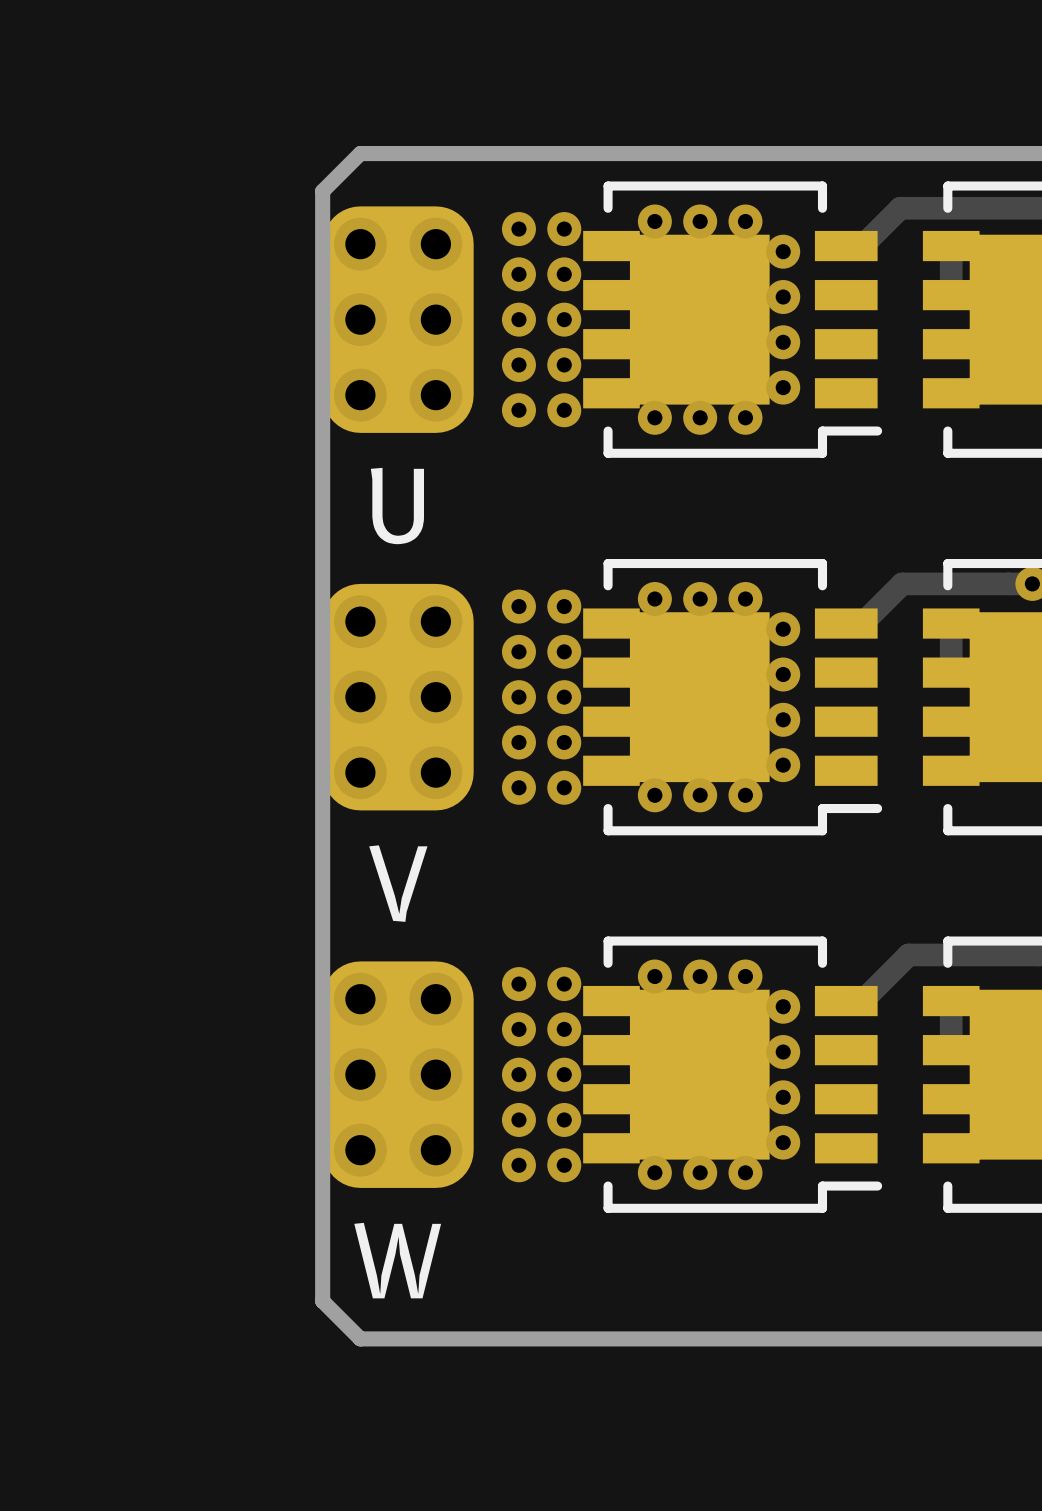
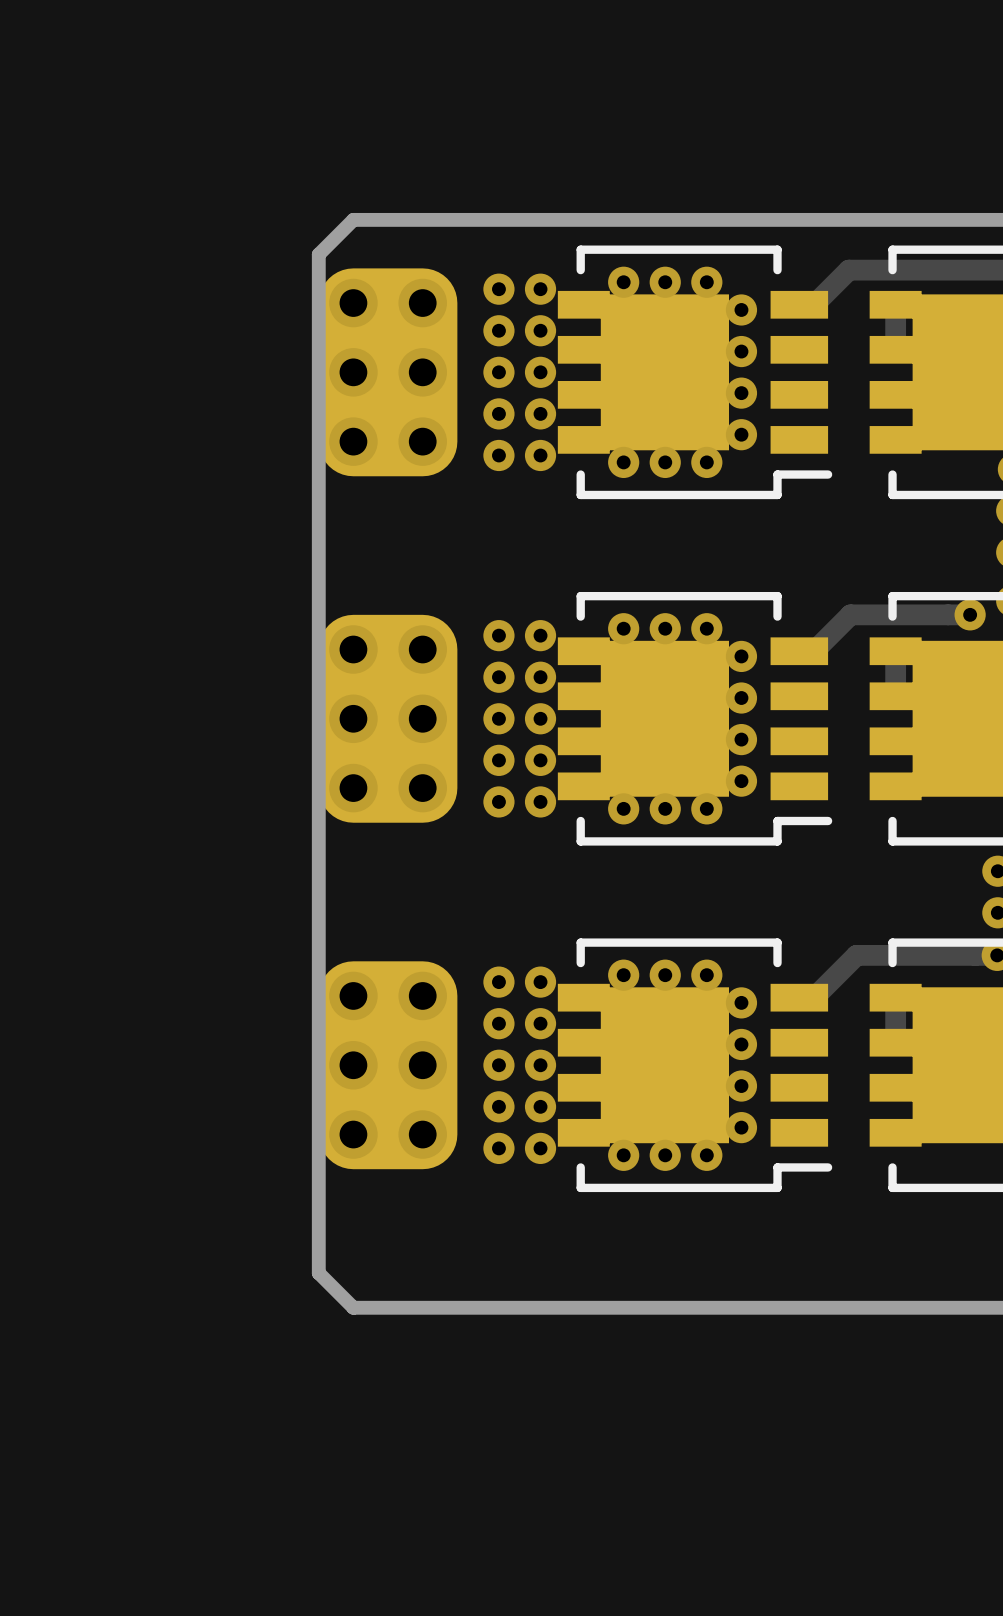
text: U (397, 506) -> none
text: V (398, 883) -> none
text: W (397, 1260) -> none

